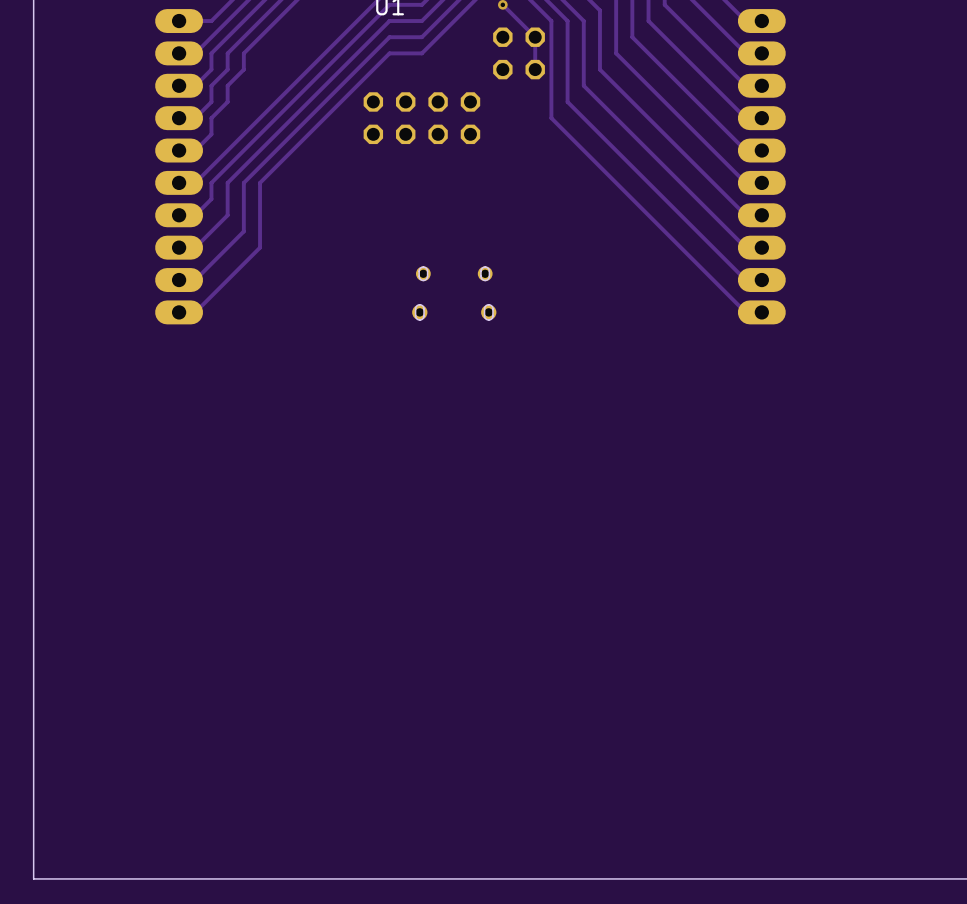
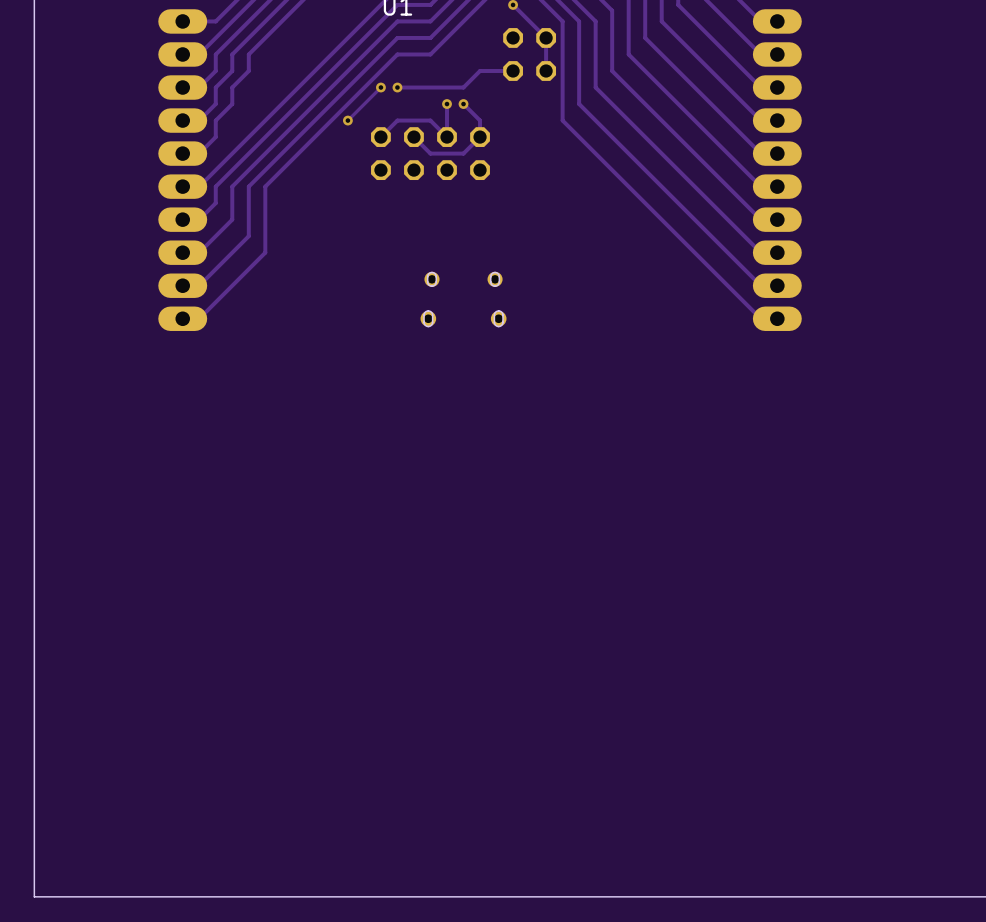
track: none -> (513, 71) (480, 71) (463, 87) (397, 87)
track: none -> (380, 87) (347, 120)
via: none -> (380, 87)
via: none -> (397, 87)
track: none -> (447, 104) (447, 137) (430, 120) (397, 120) (380, 137)
via: none -> (447, 104)
track: none -> (463, 104) (480, 120) (480, 137) (463, 153) (430, 153) (413, 137)
via: none -> (463, 104)
via: none -> (347, 120)
part position: (421, 118) -> (430, 153)

